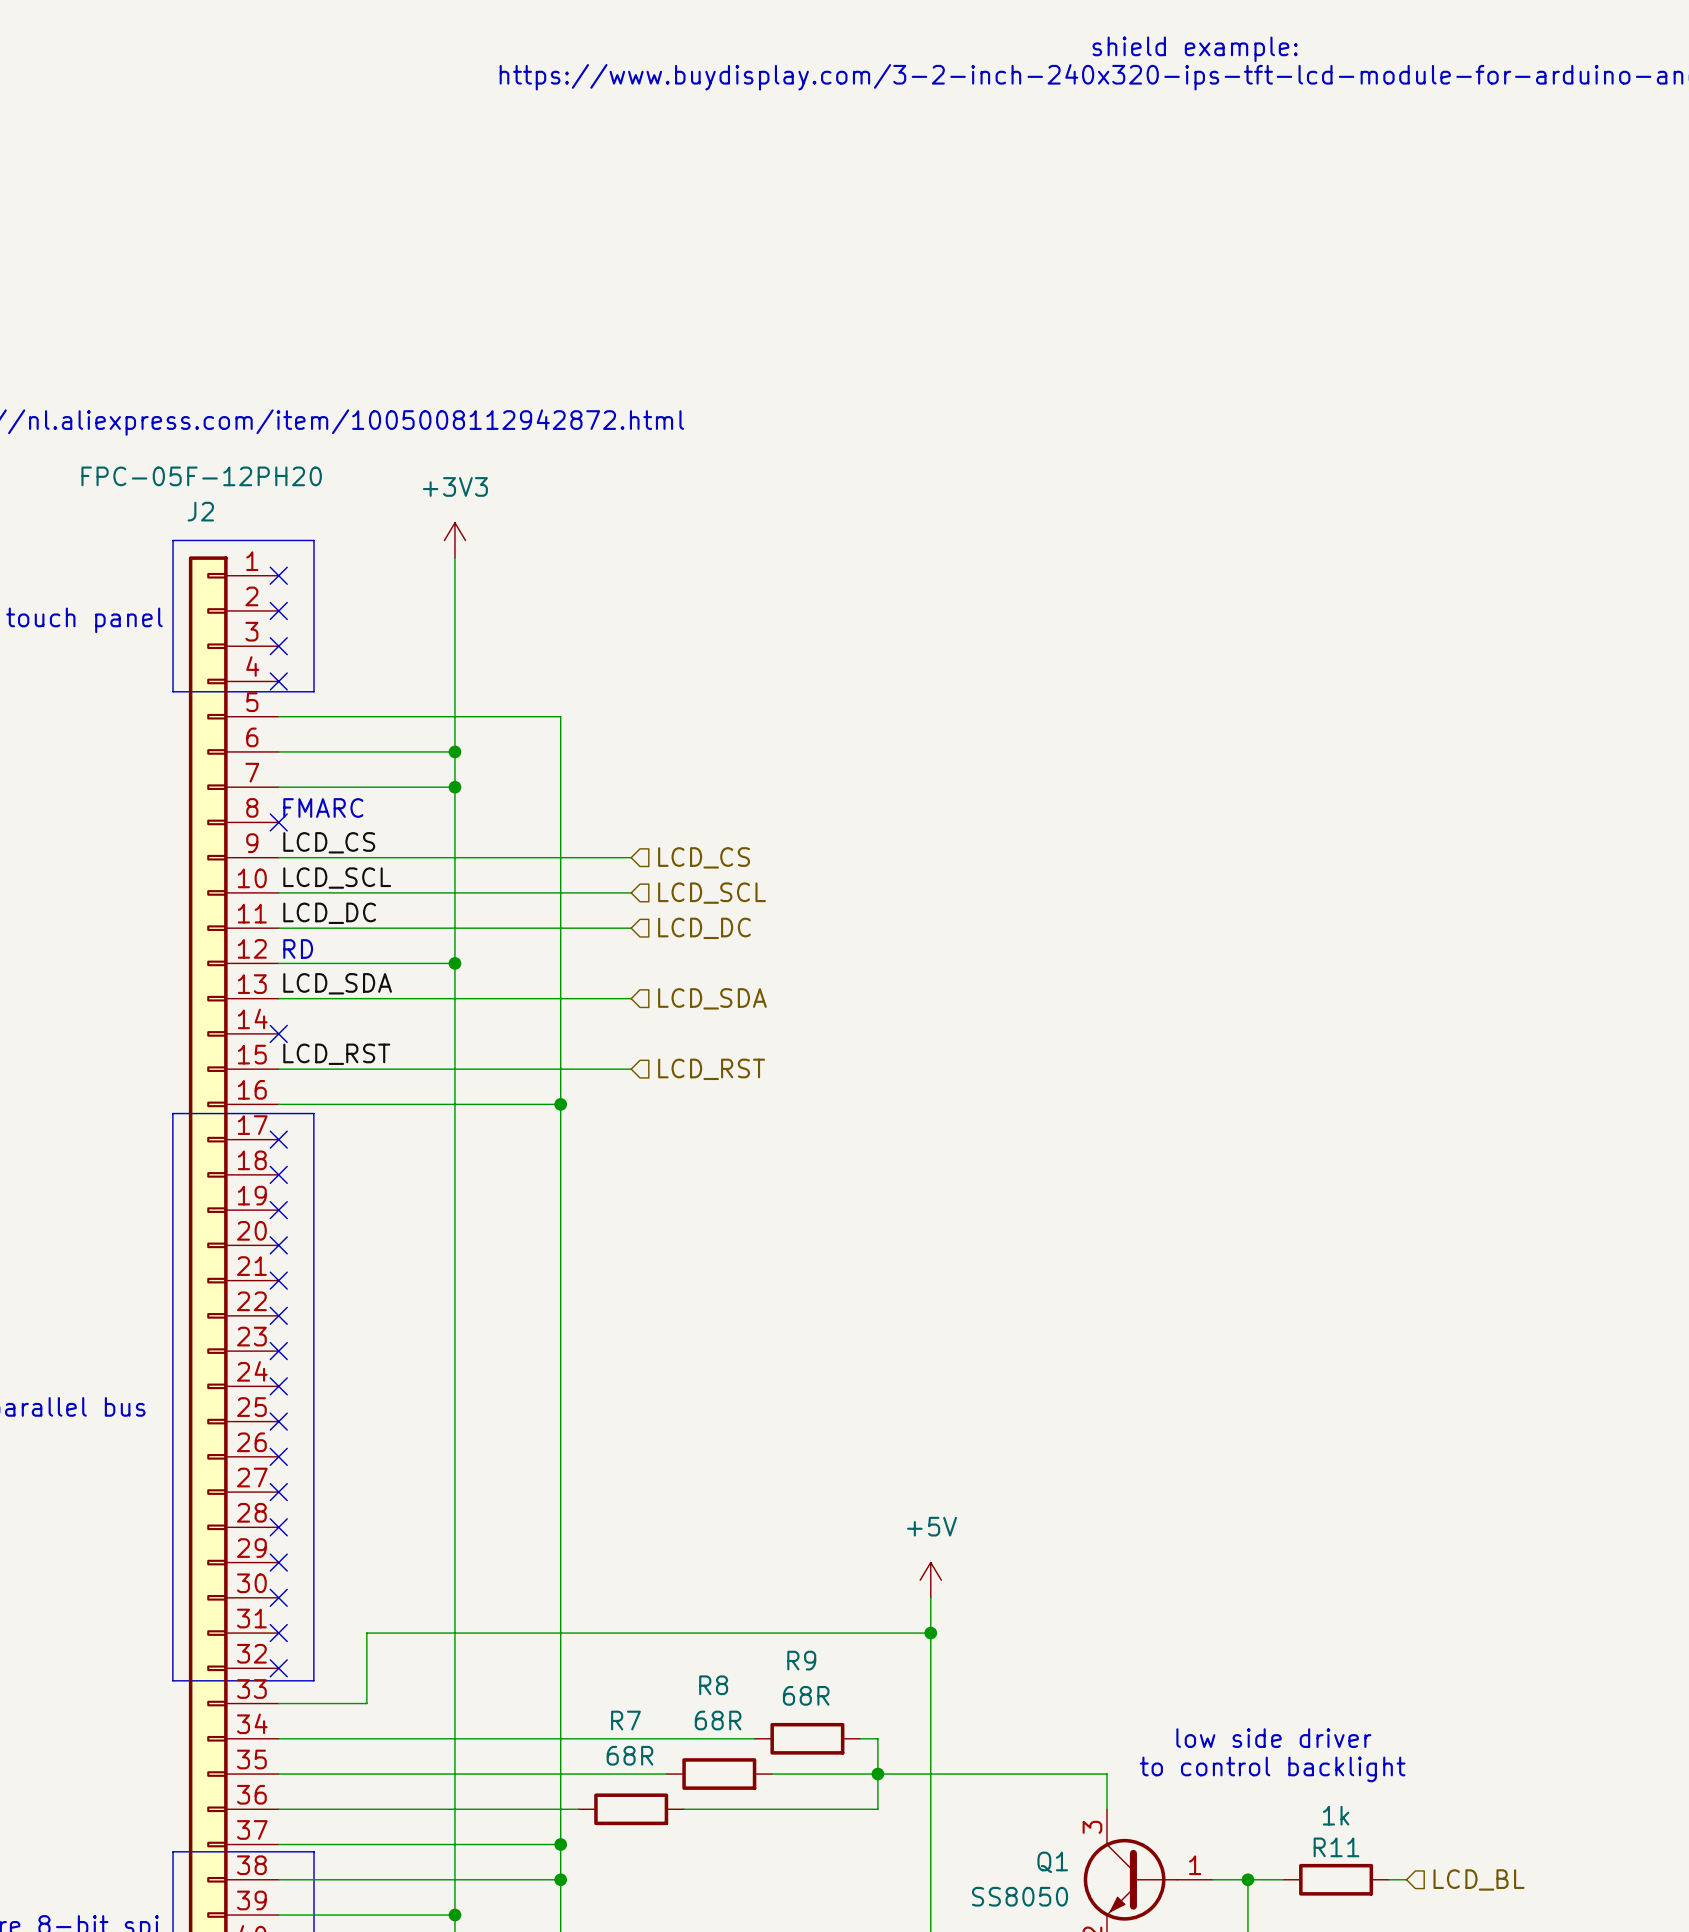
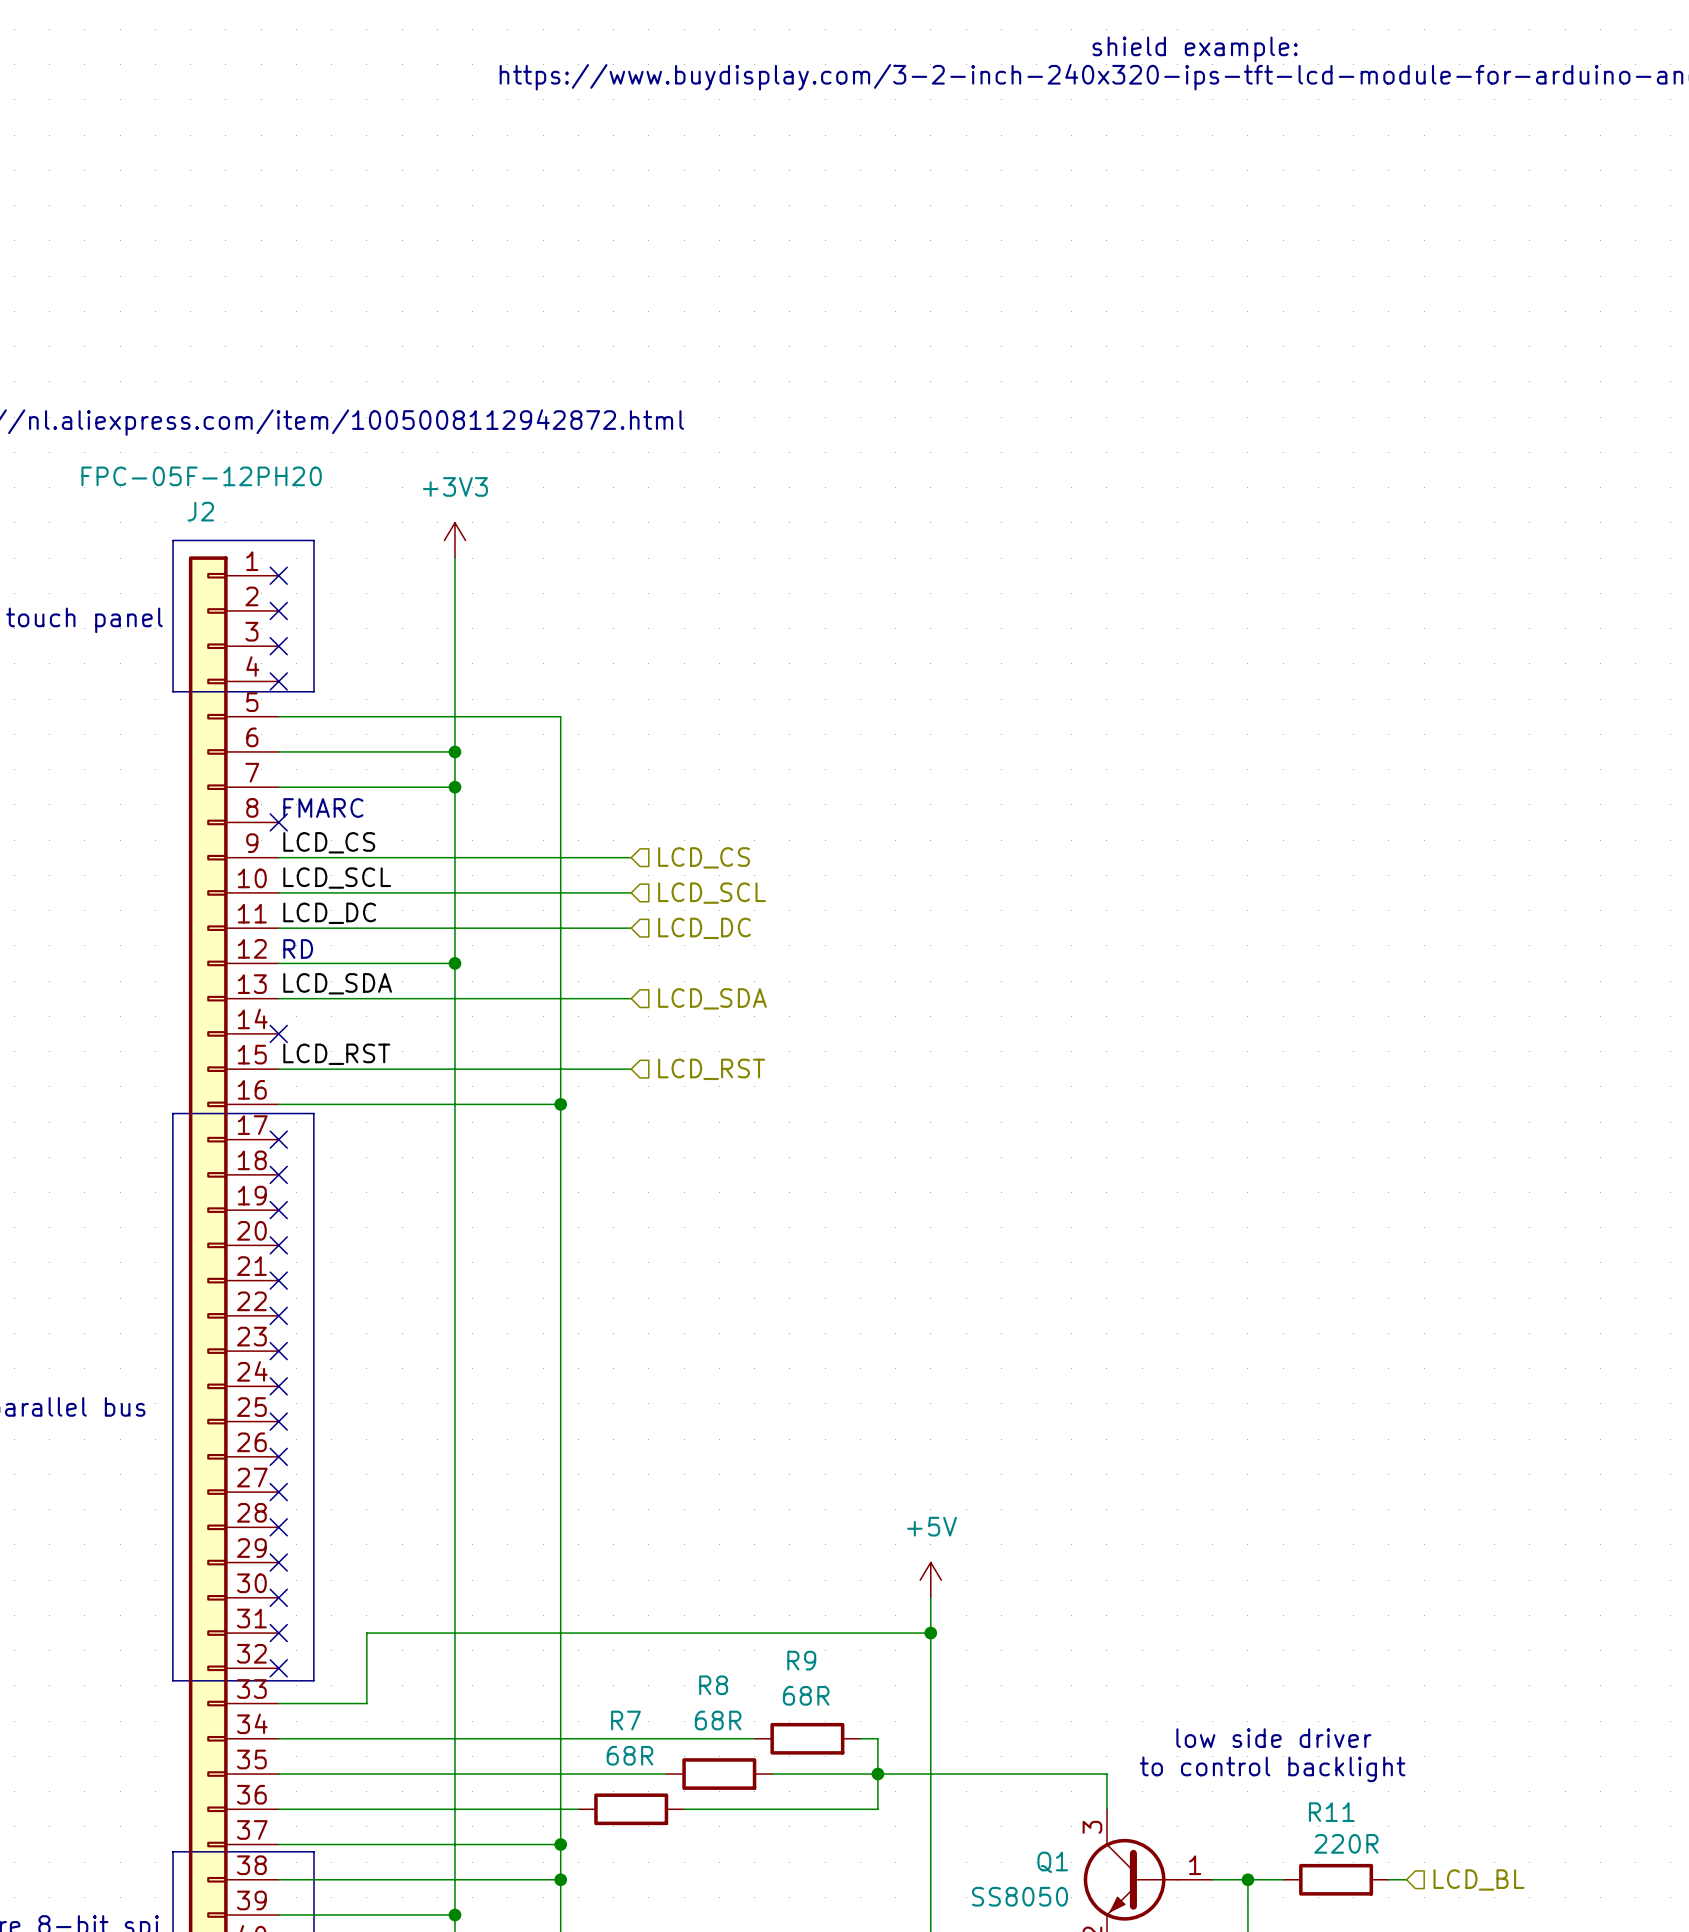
R11 value: 1k (1336, 1815) -> 220R (1346, 1843)
R11 name position: R11 (1336, 1847) -> R11 (1331, 1812)

